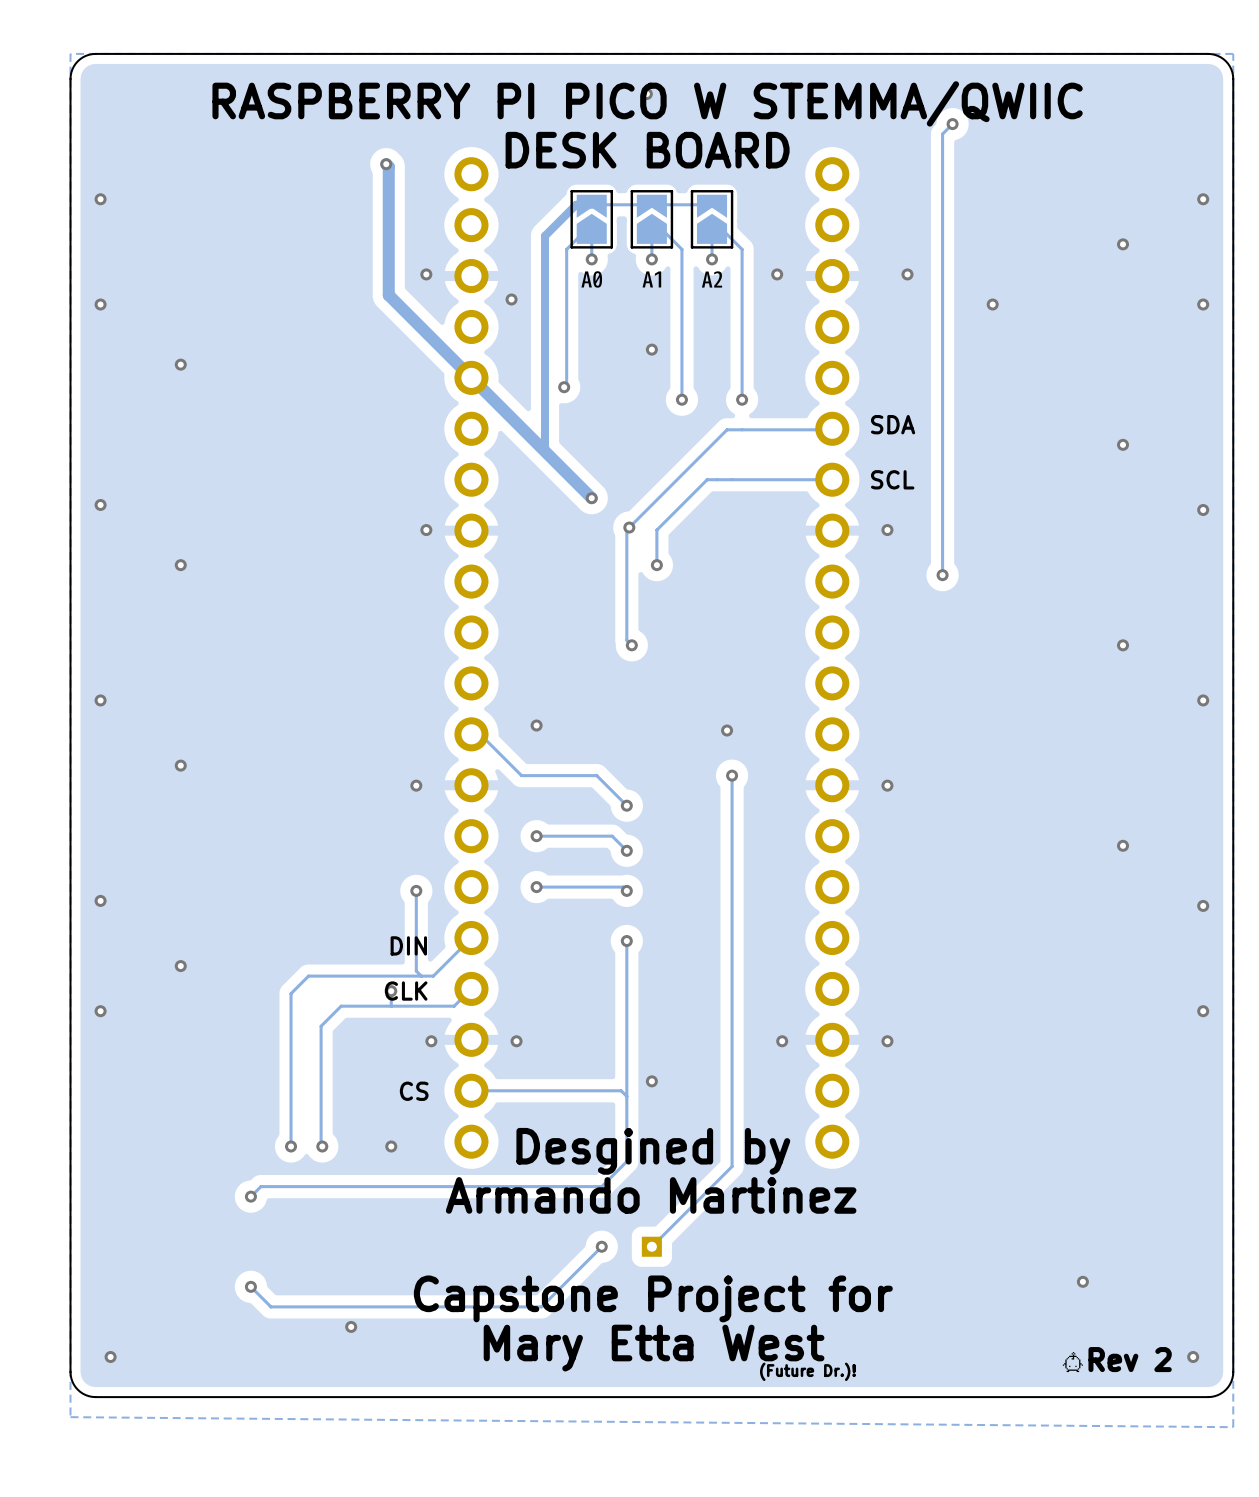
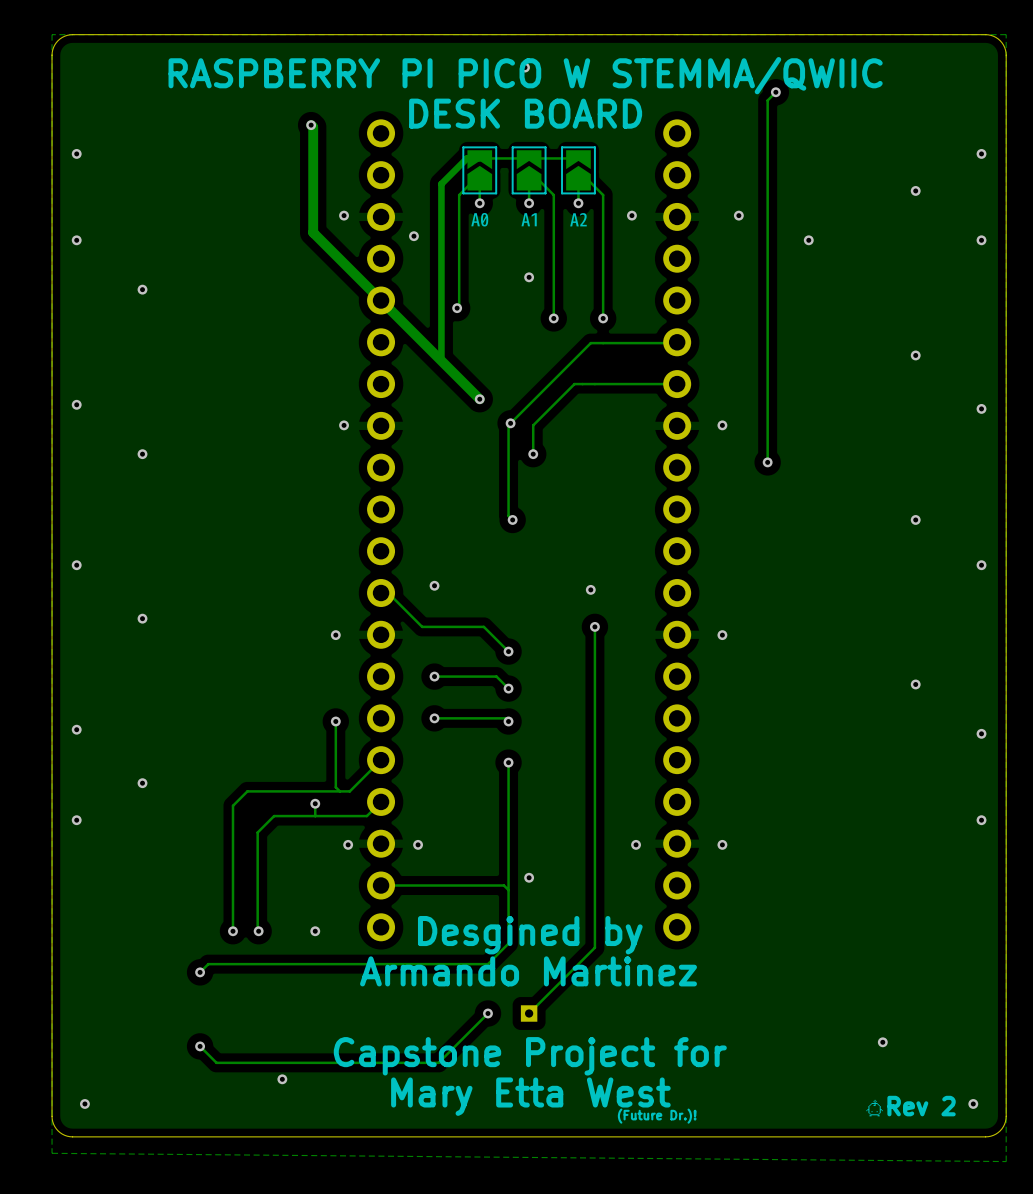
text: SDA (893, 424) -> none
text: SCL (892, 479) -> none
text: DIN (408, 945) -> none
text: CLK (406, 991) -> none
text: CS (414, 1091) -> none

